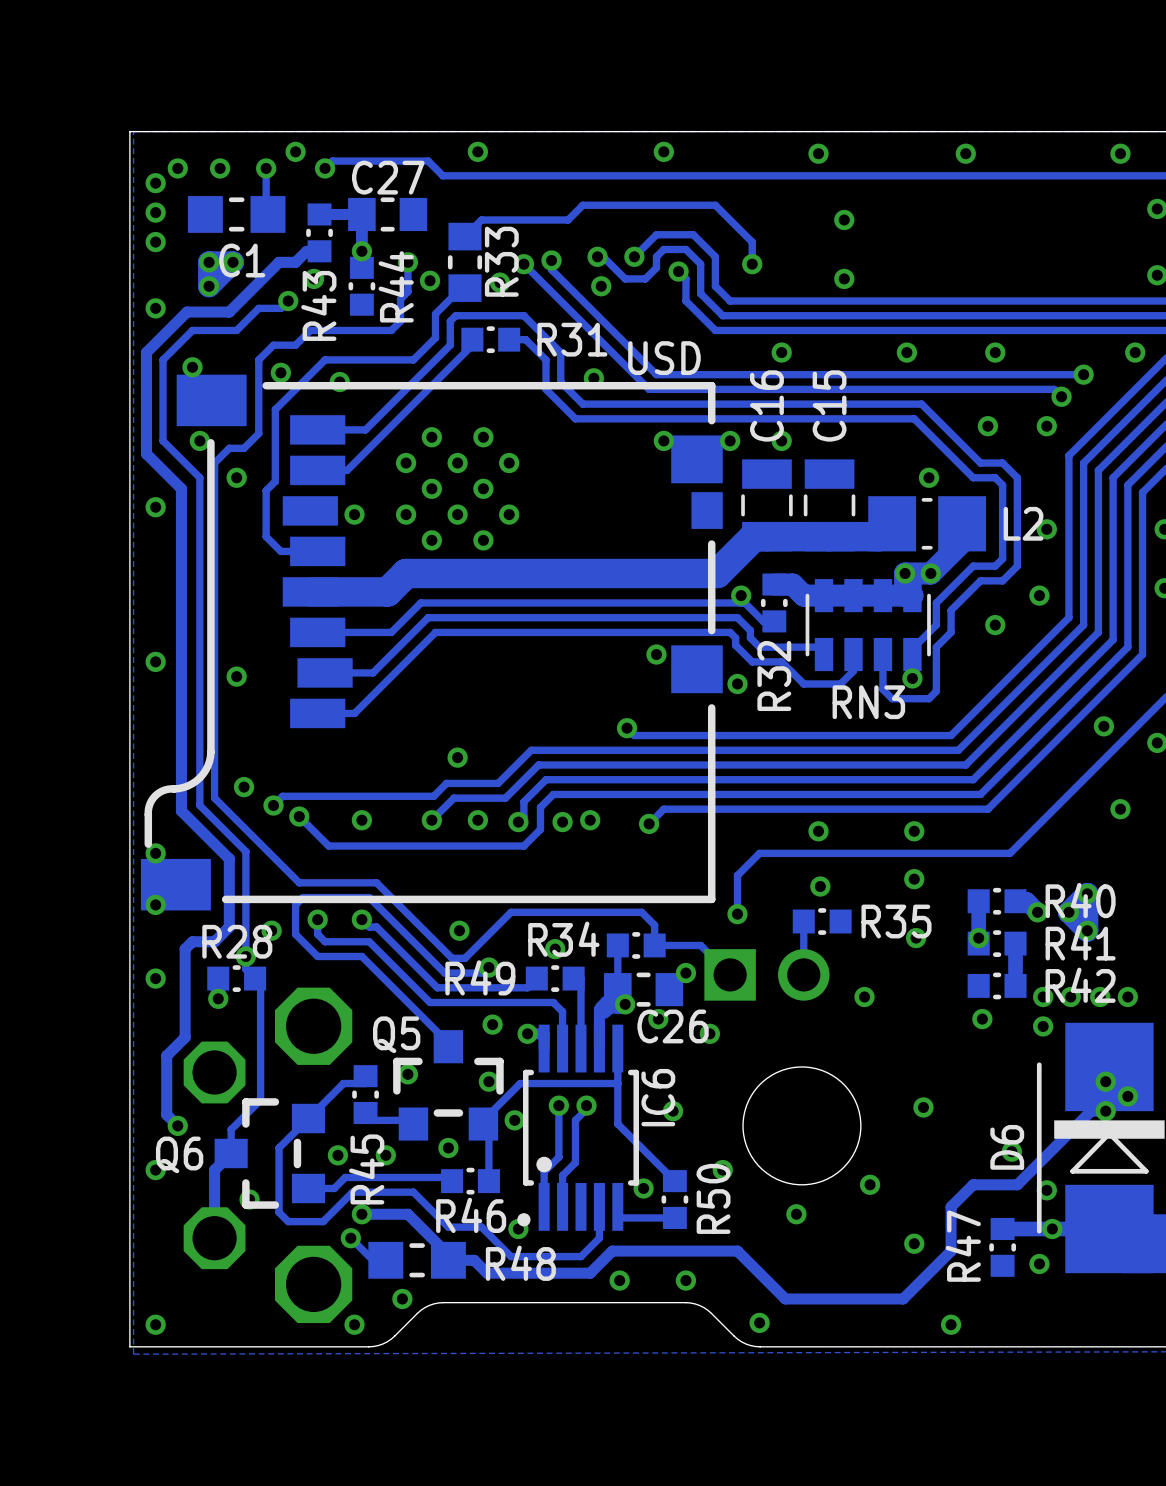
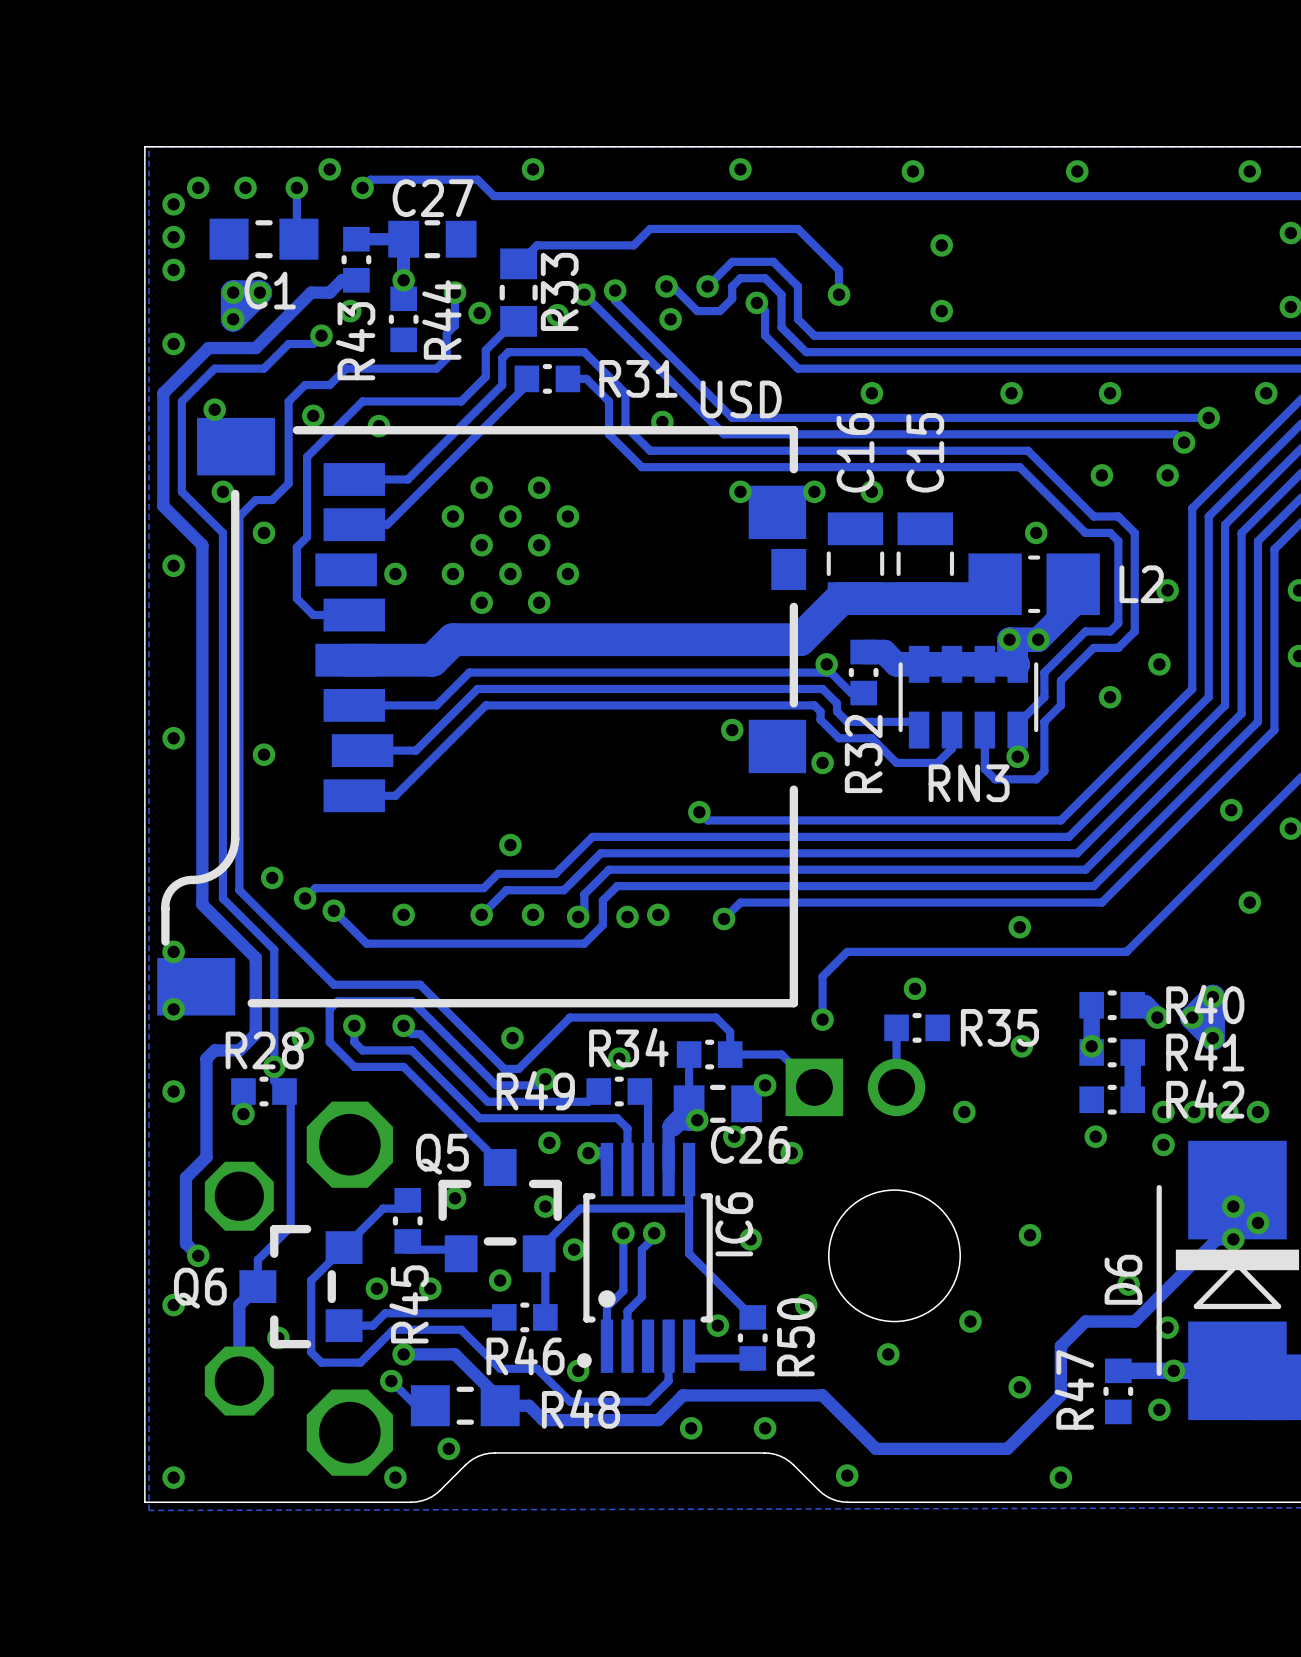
via: (818, 831) -> none
via: (914, 879) -> none

